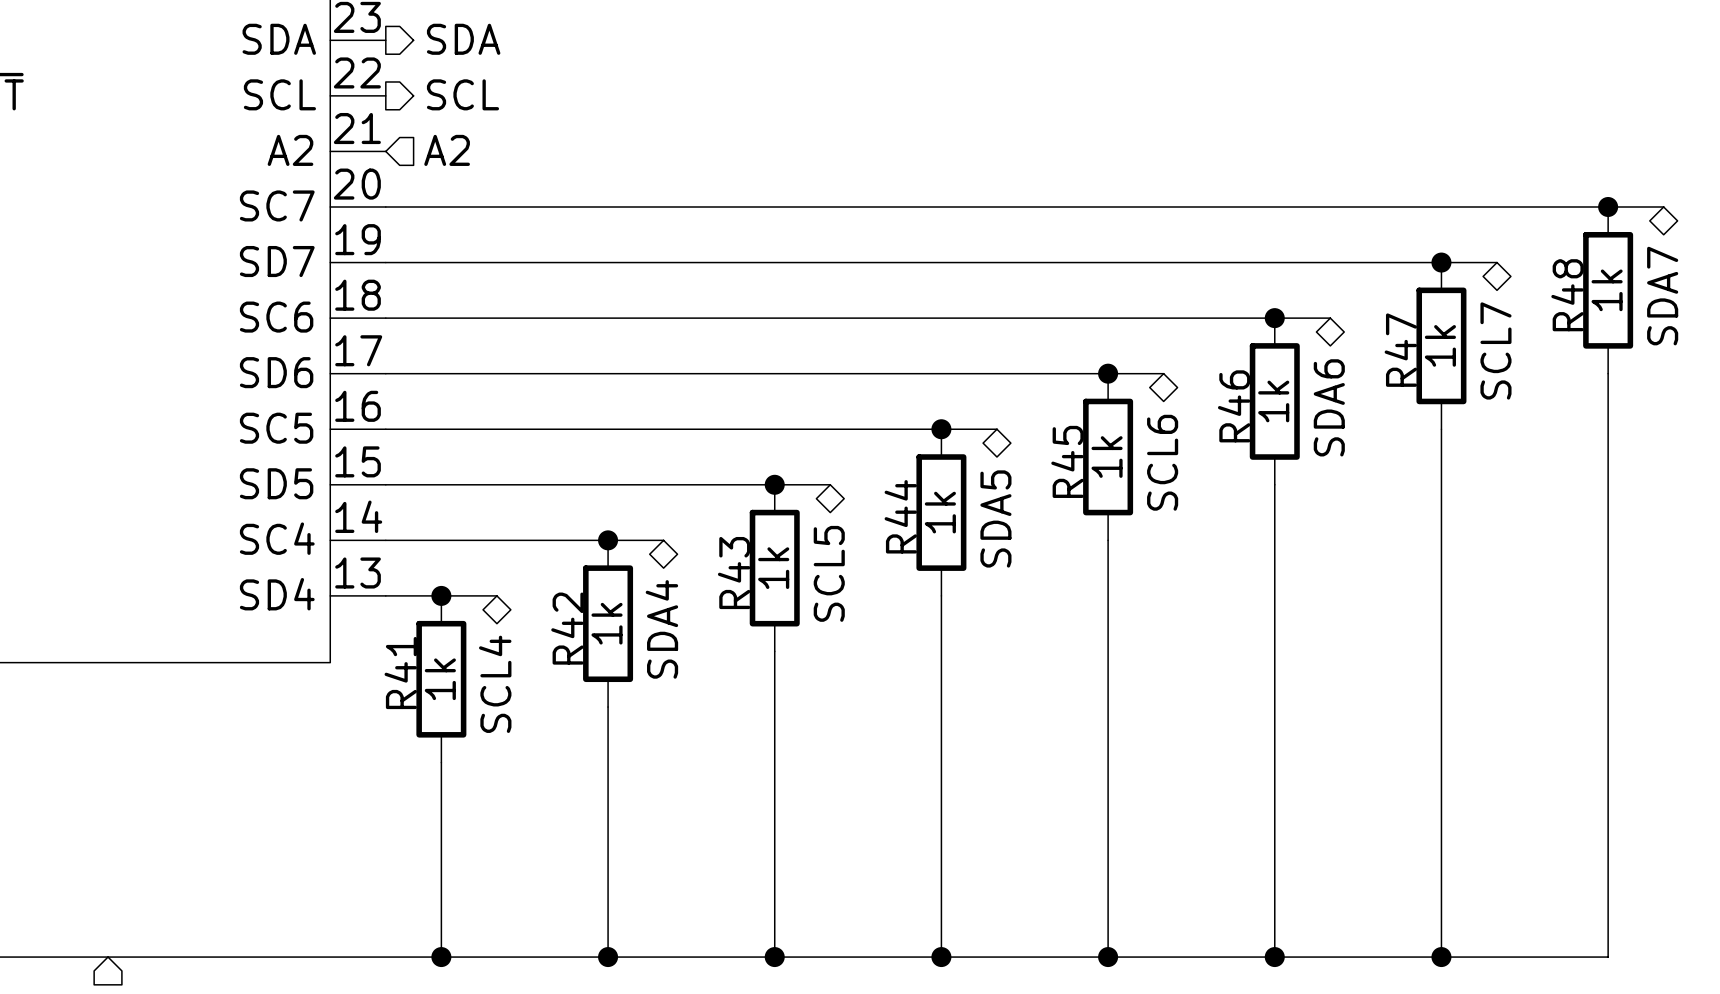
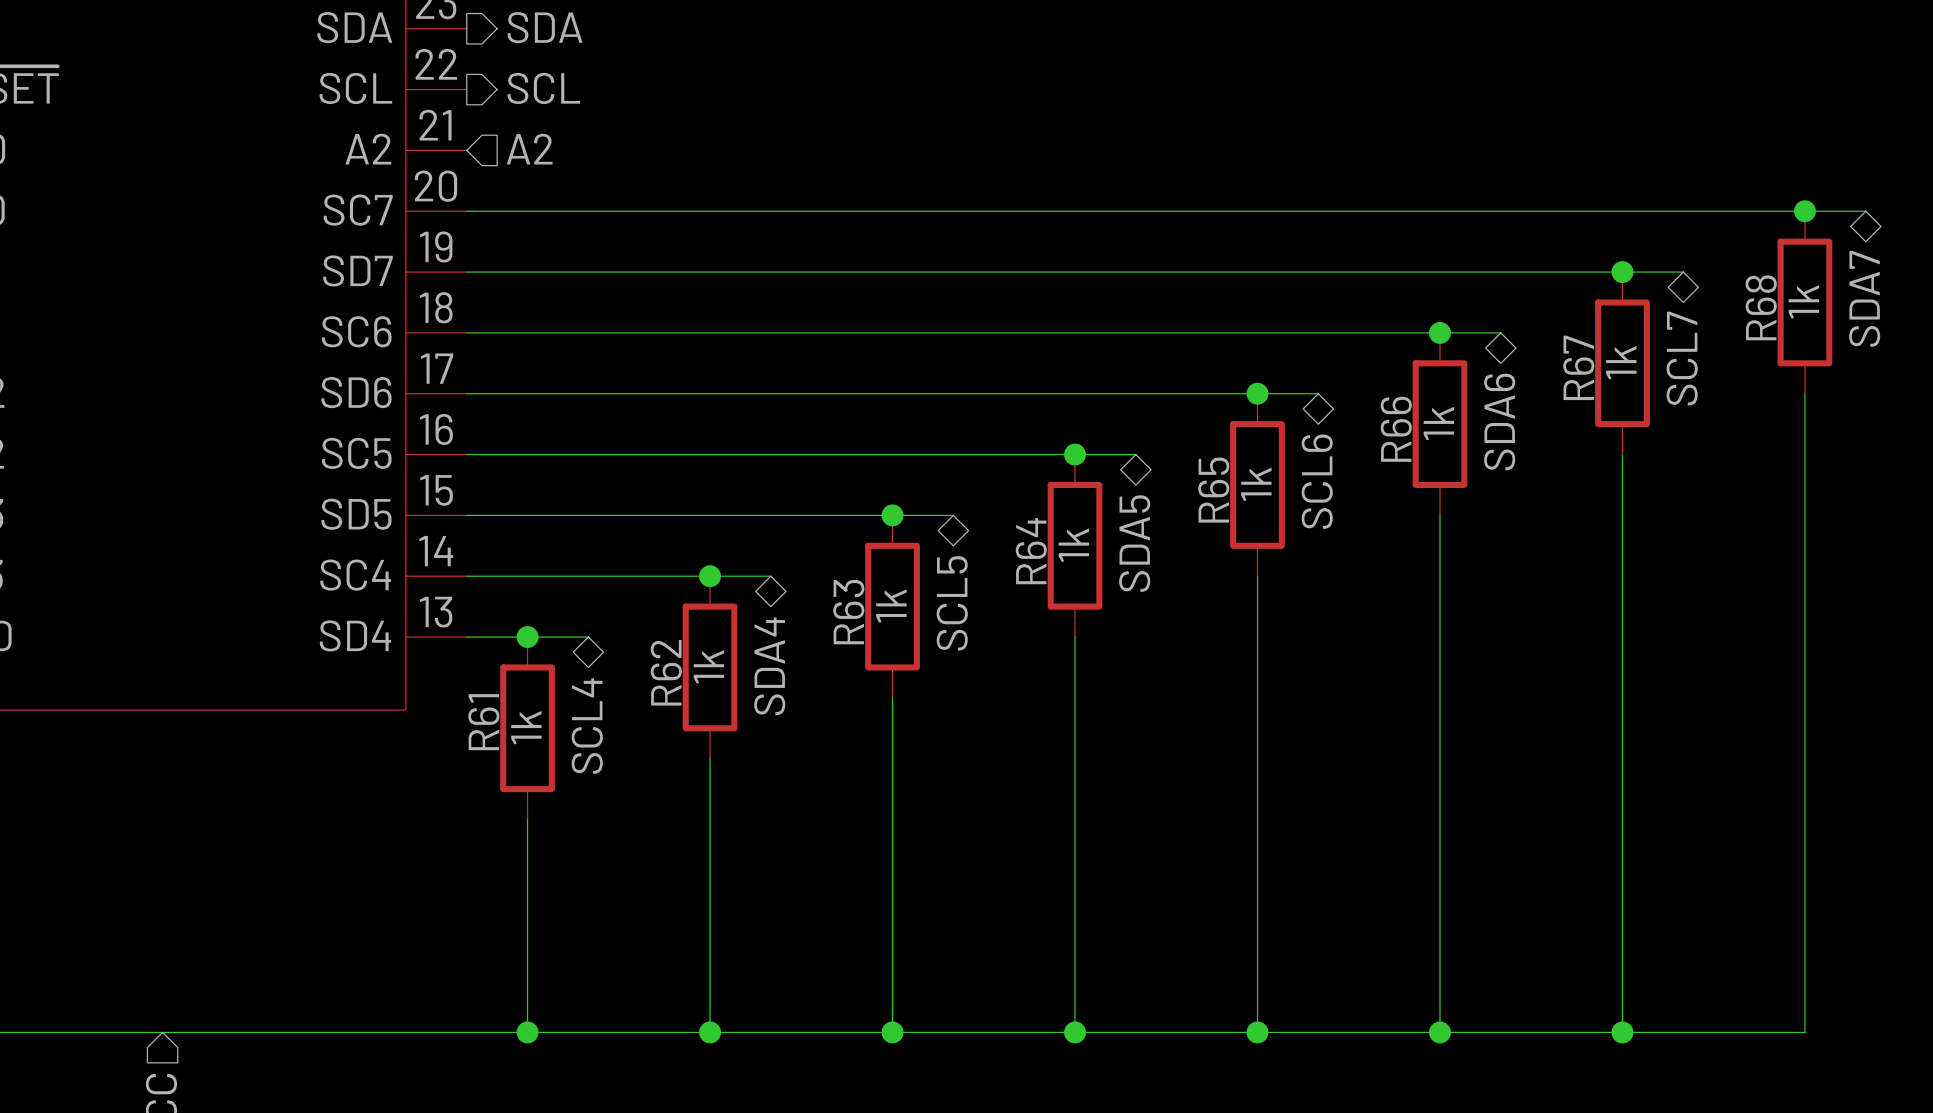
R48 name: R48 (1567, 295) -> R68 (1761, 307)
R47 name: R47 (1400, 350) -> R67 (1578, 367)
R46 name: R46 (1234, 406) -> R66 (1396, 429)
R45 name: R45 (1067, 461) -> R65 (1213, 490)
R44 name: R44 (900, 516) -> R64 (1031, 551)
R43 name: R43 (734, 573) -> R63 (848, 612)
R42 name: R42 (567, 628) -> R62 (666, 672)
R41 name: R41 (400, 673) -> R61 (483, 722)

